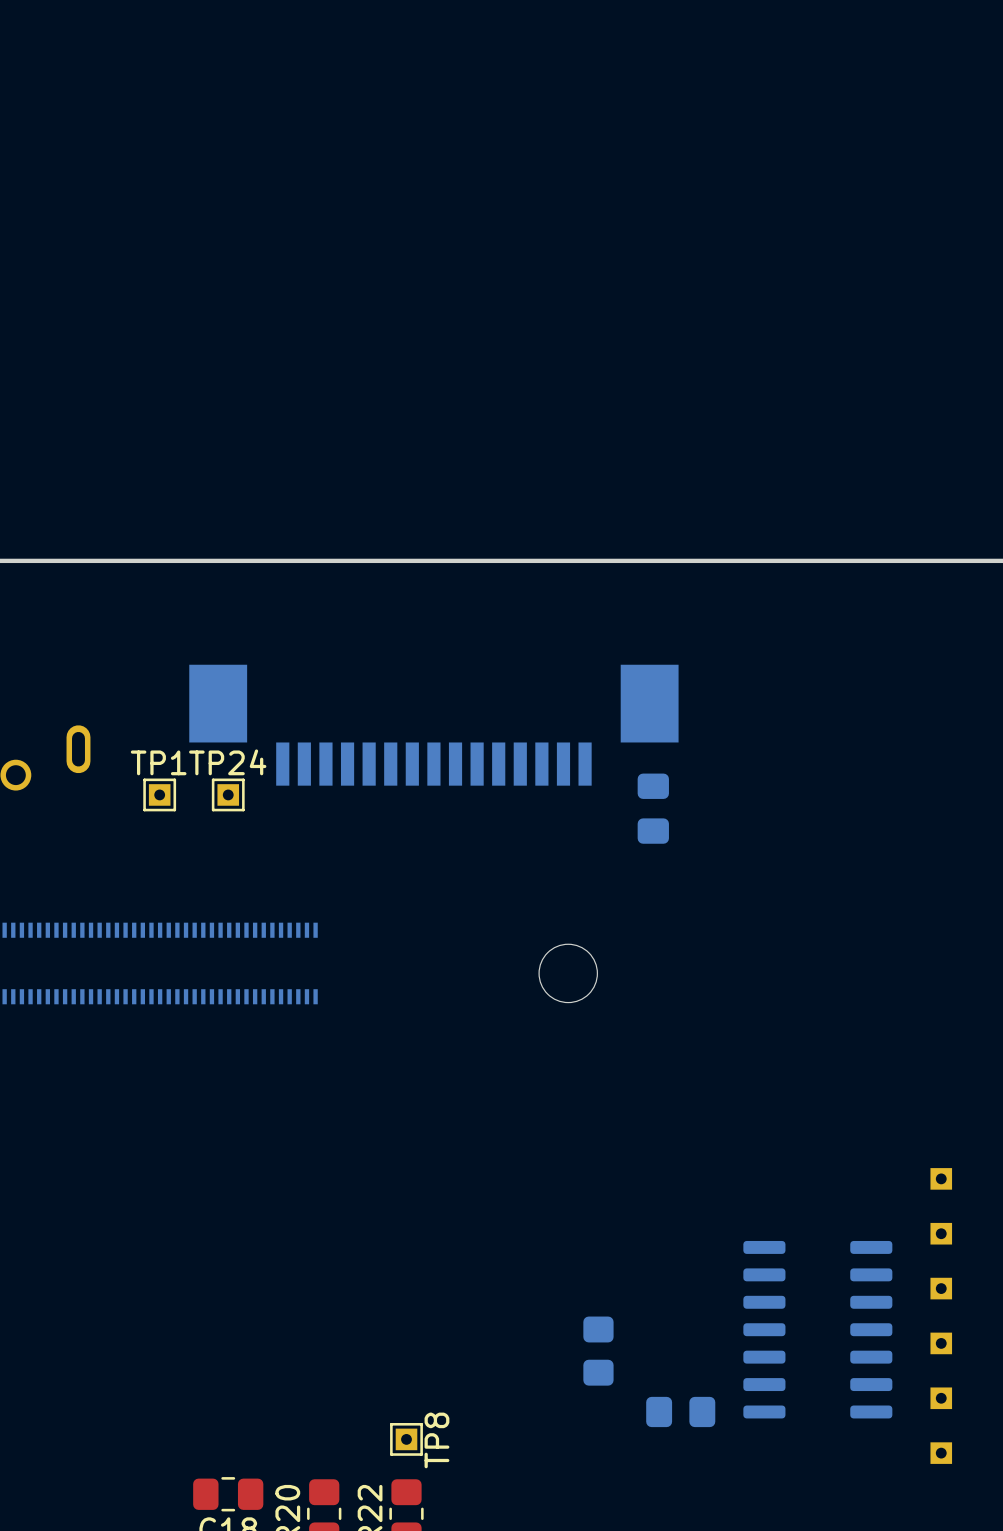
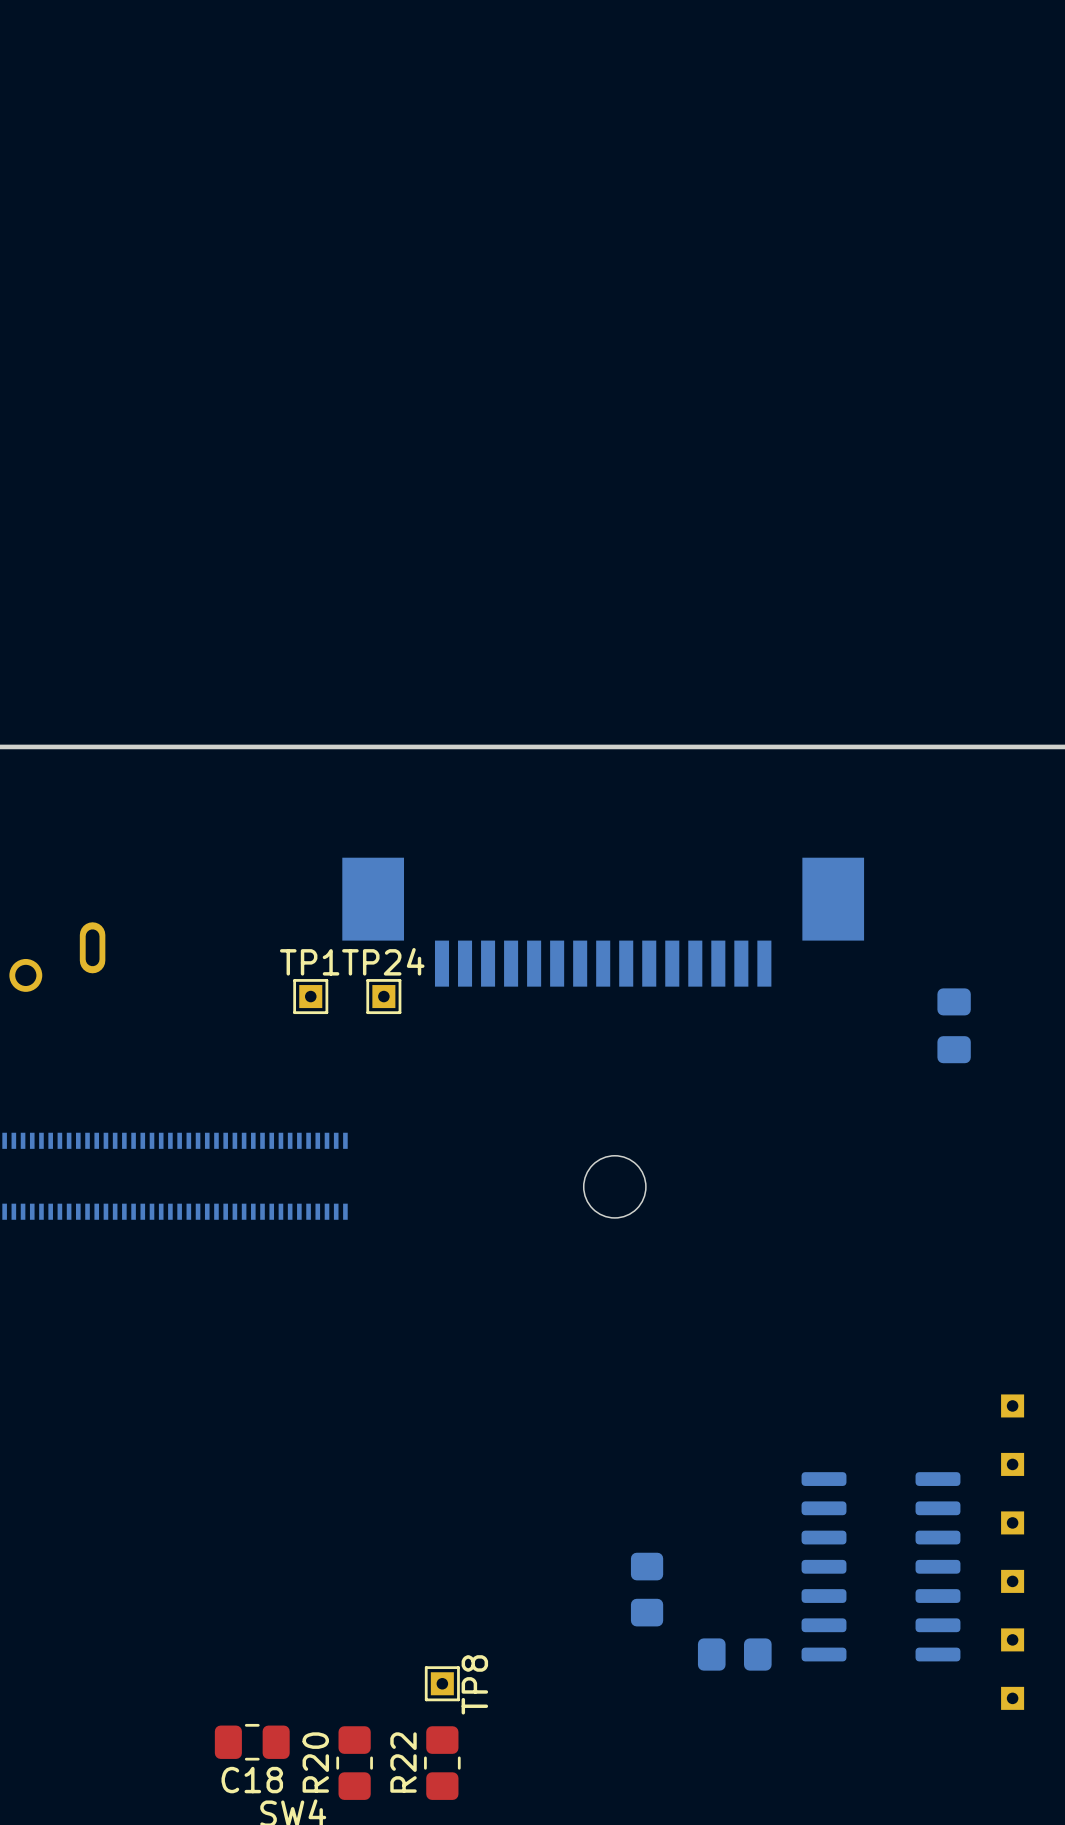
part position: (433, 725) -> (603, 922)
TP1 position: (159, 794) -> (310, 996)
TP24 position: (228, 794) -> (383, 996)
part position: (653, 808) -> (954, 1025)

